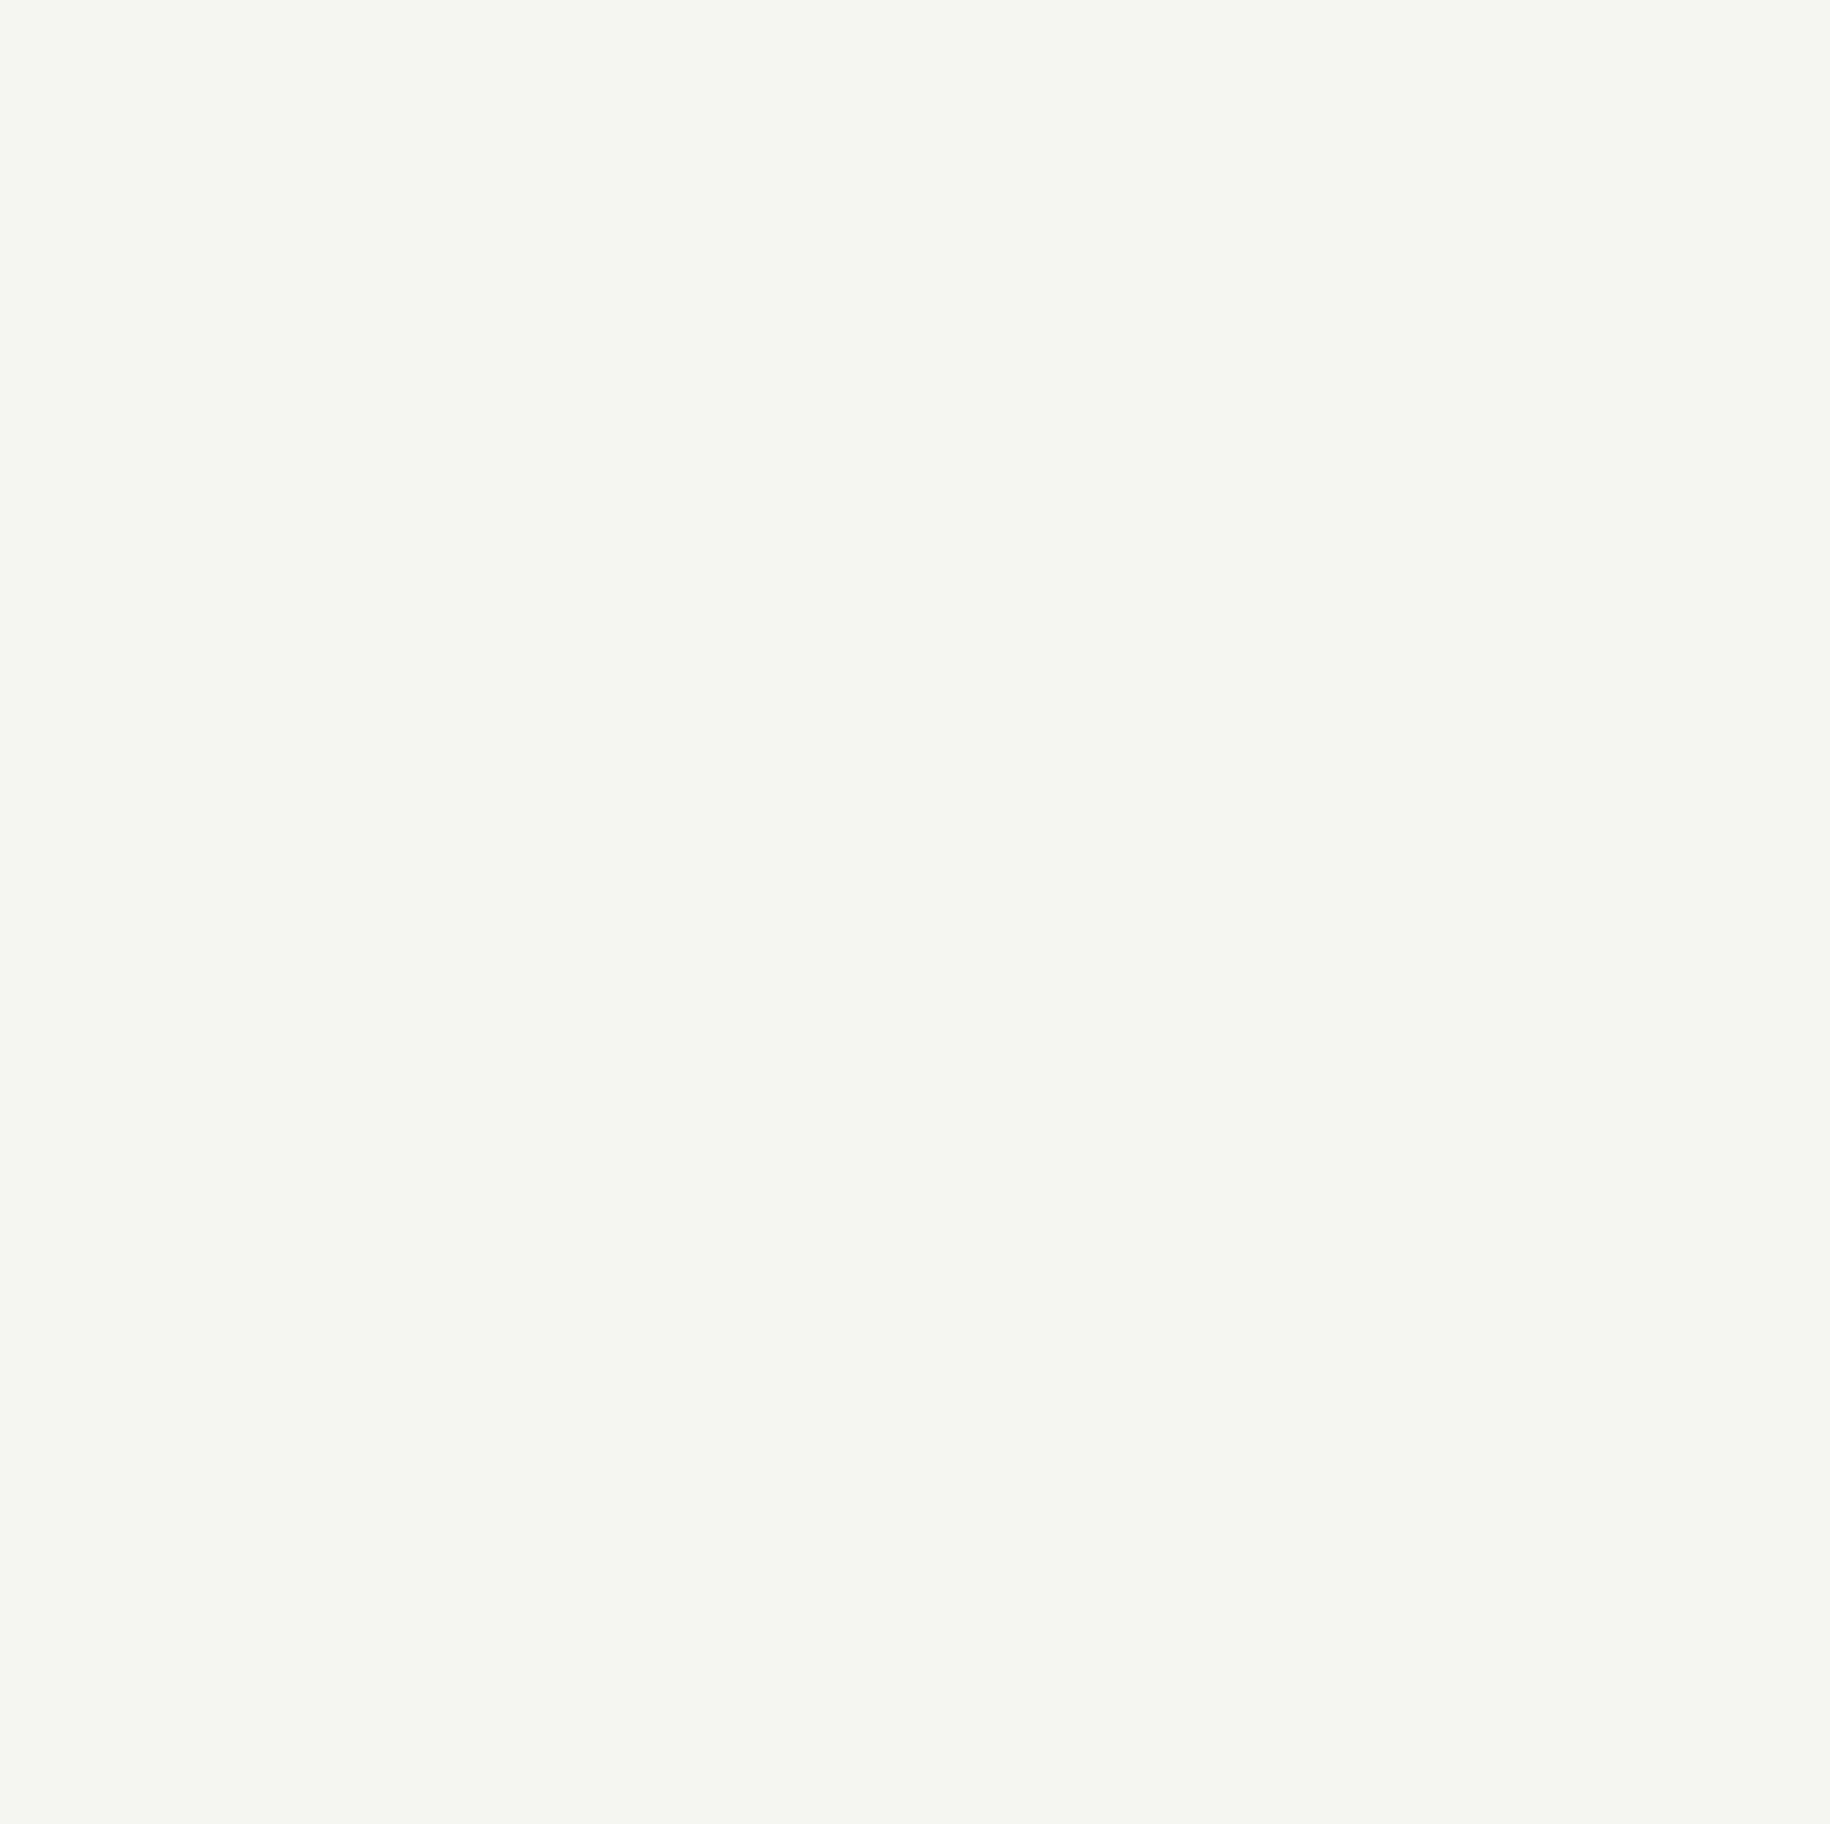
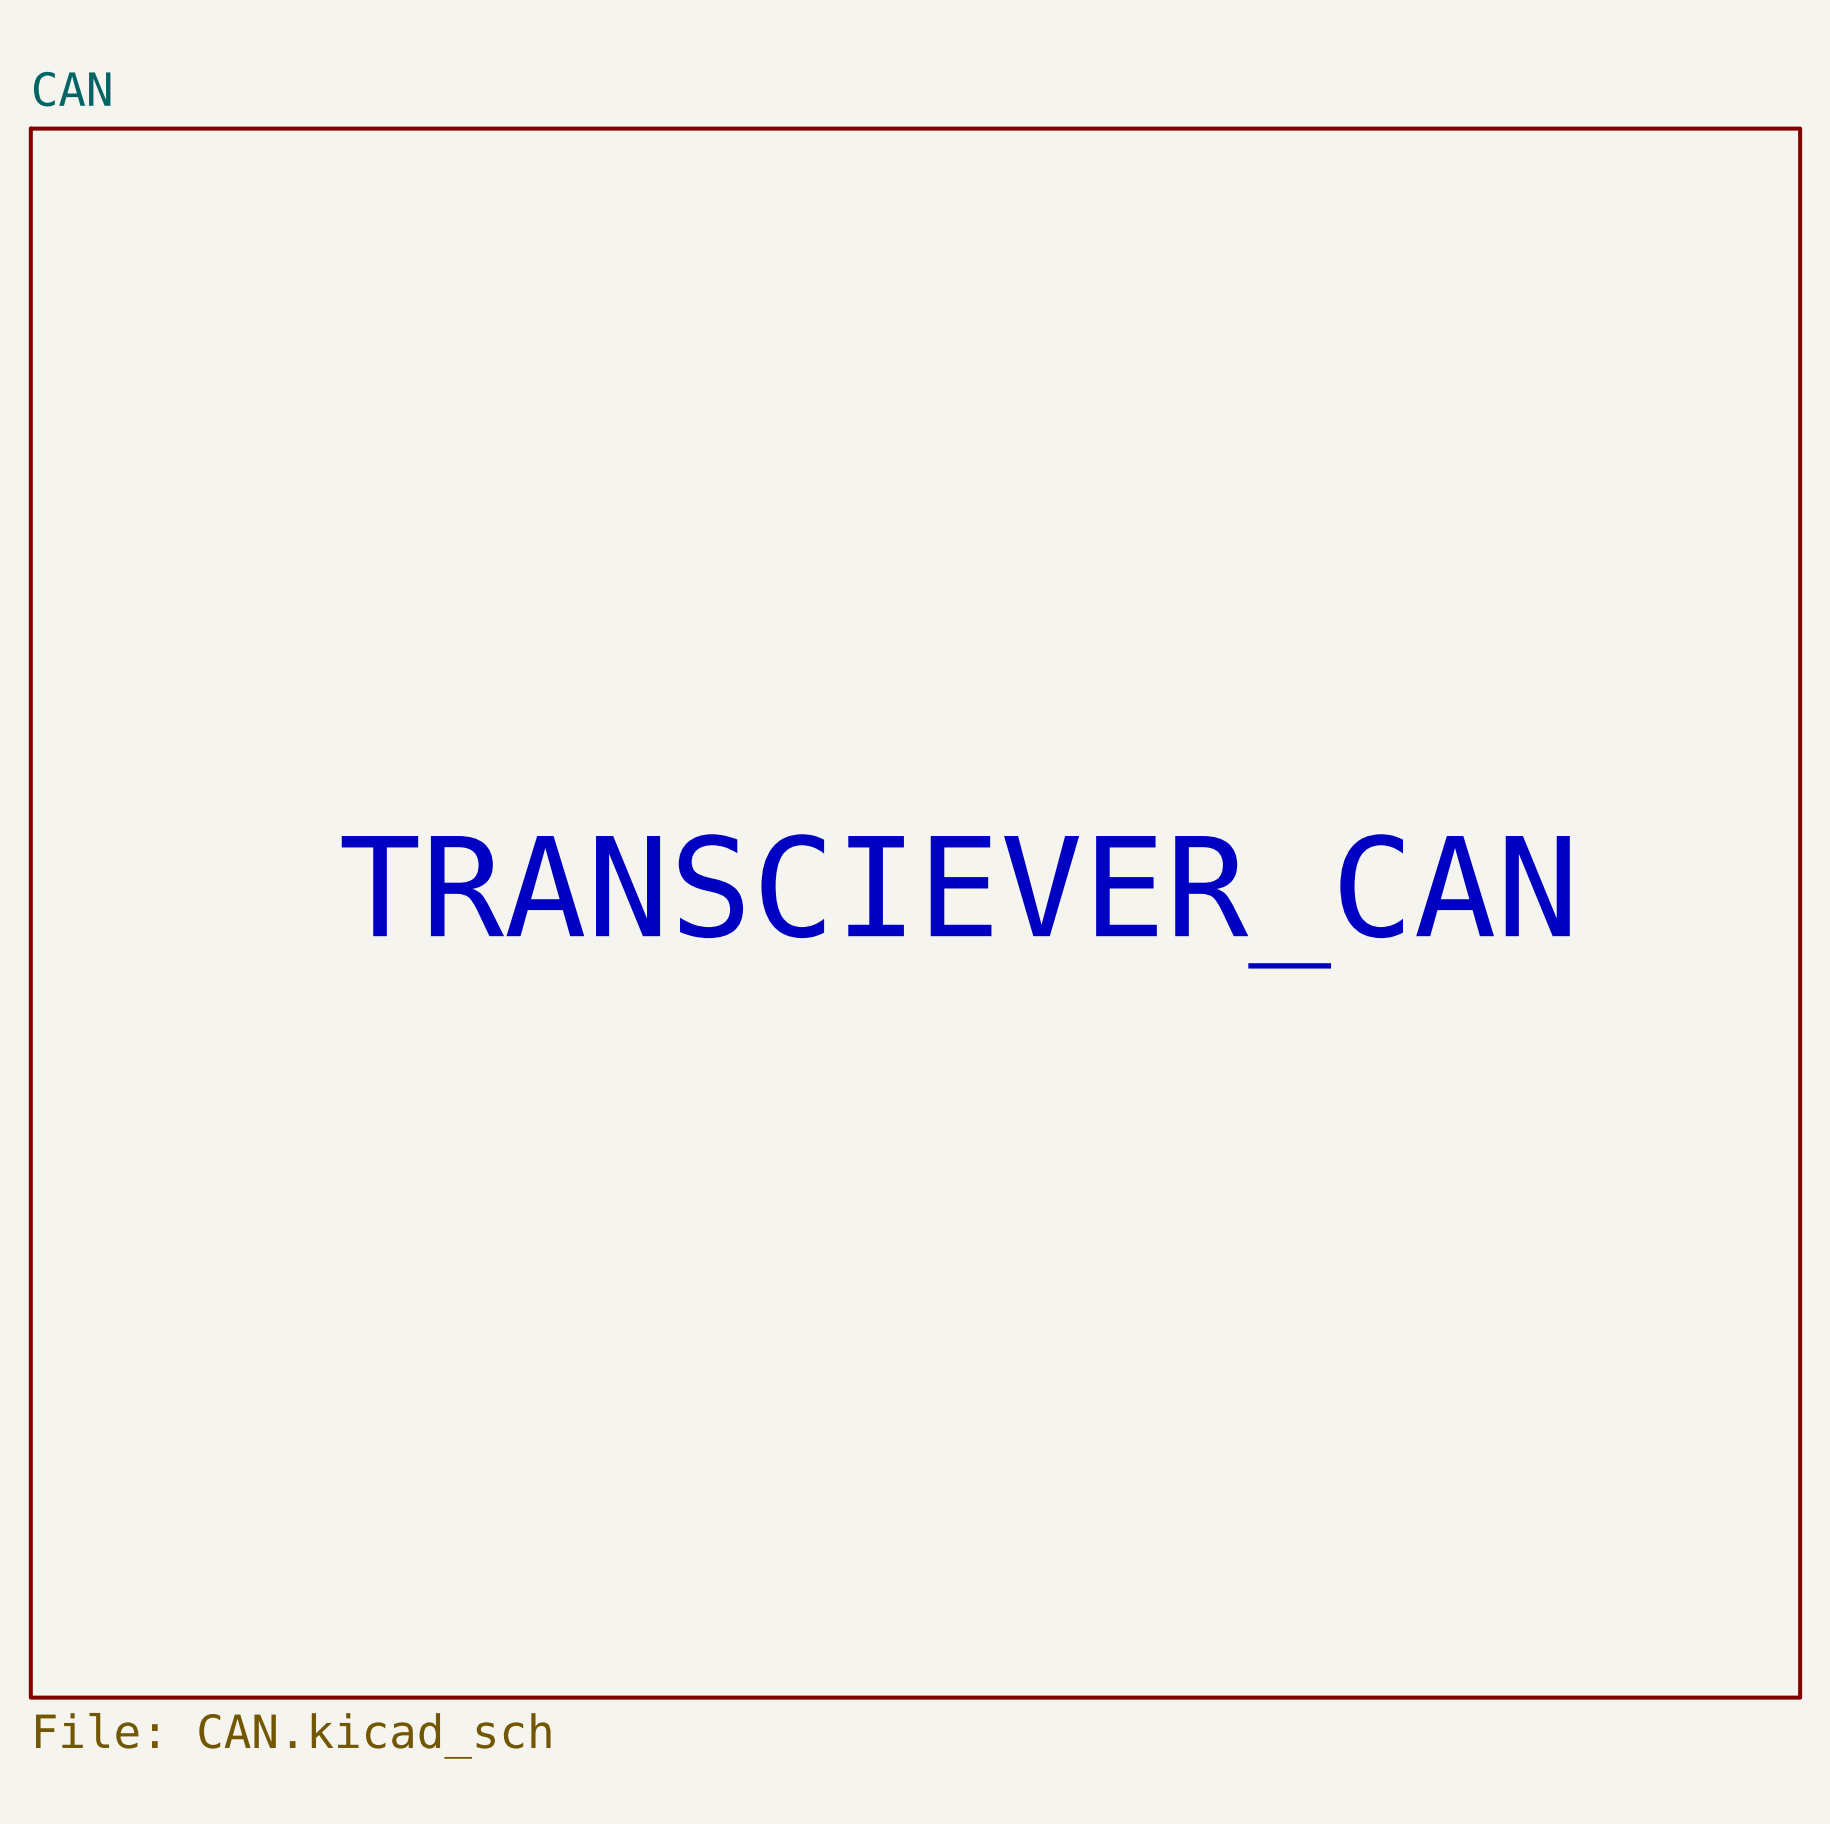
text: none -> TRANSCIEVER_CAN (955, 901)
sheet CAN: none -> File: CAN.kicad_sch (915, 913)

